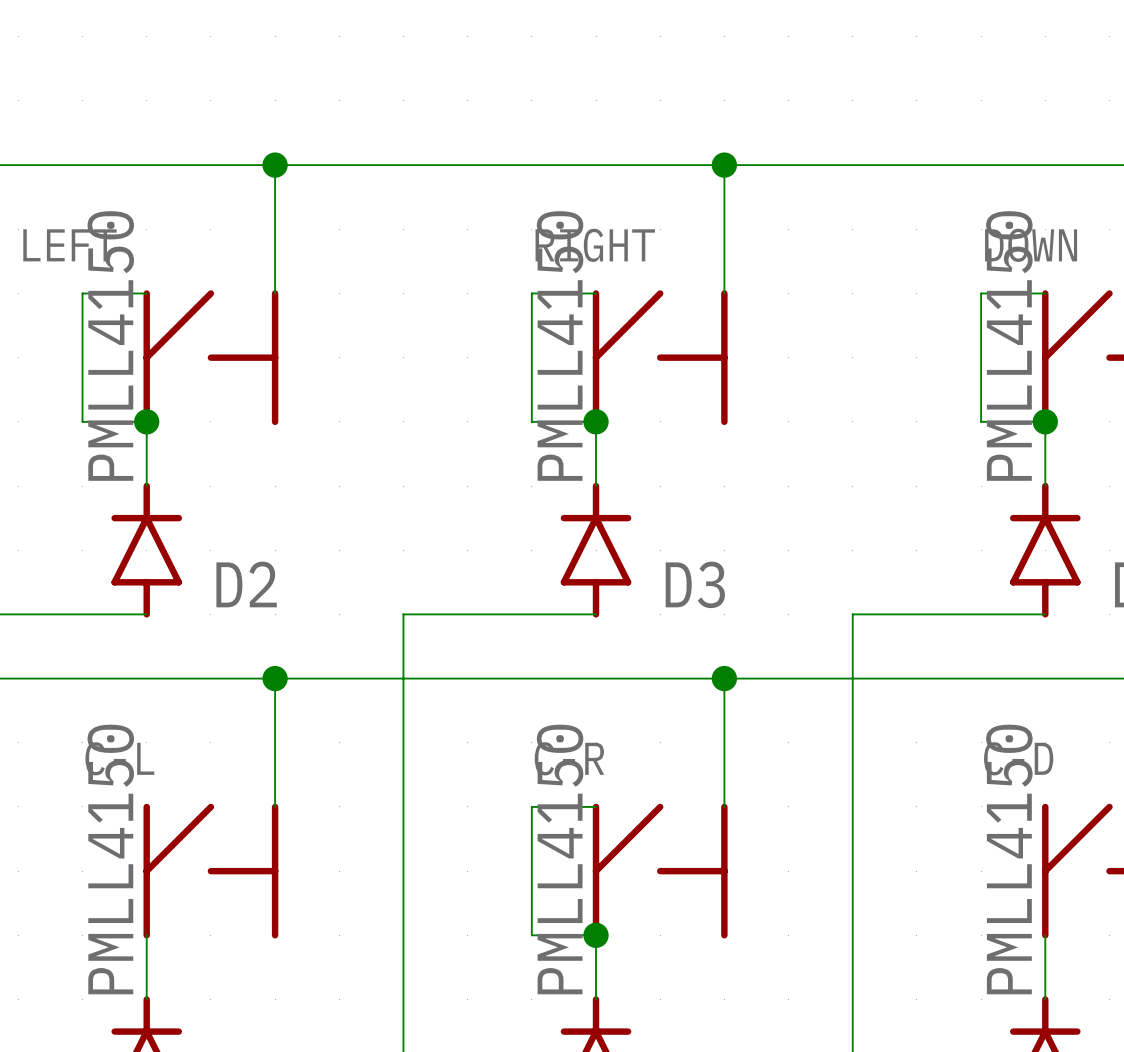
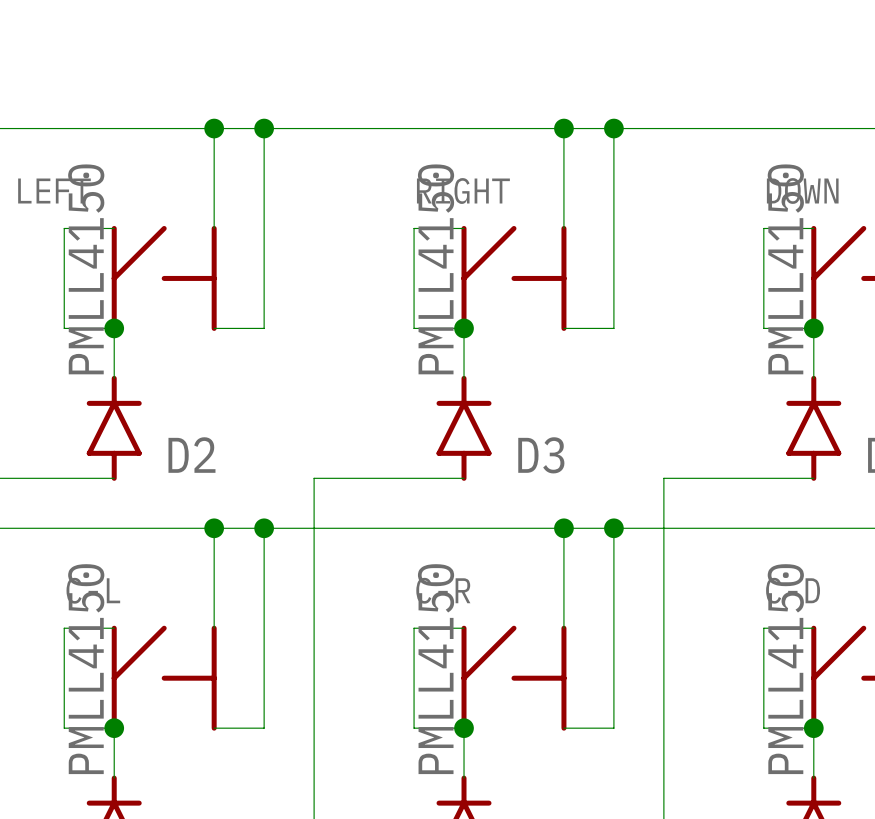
wire: none -> (264, 128) (264, 328) (214, 328)
junction: none -> (264, 128)
wire: none -> (613, 128) (613, 328) (563, 328)
junction: none -> (613, 128)
wire: none -> (264, 528) (264, 728) (214, 728)
junction: none -> (264, 528)
wire: none -> (613, 528) (613, 728) (563, 728)
junction: none -> (613, 528)
wire: none -> (114, 628) (64, 628) (64, 728) (114, 728)
wire: none -> (813, 628) (763, 628) (763, 728) (813, 728)
junction: none -> (114, 728)
junction: none -> (813, 728)

